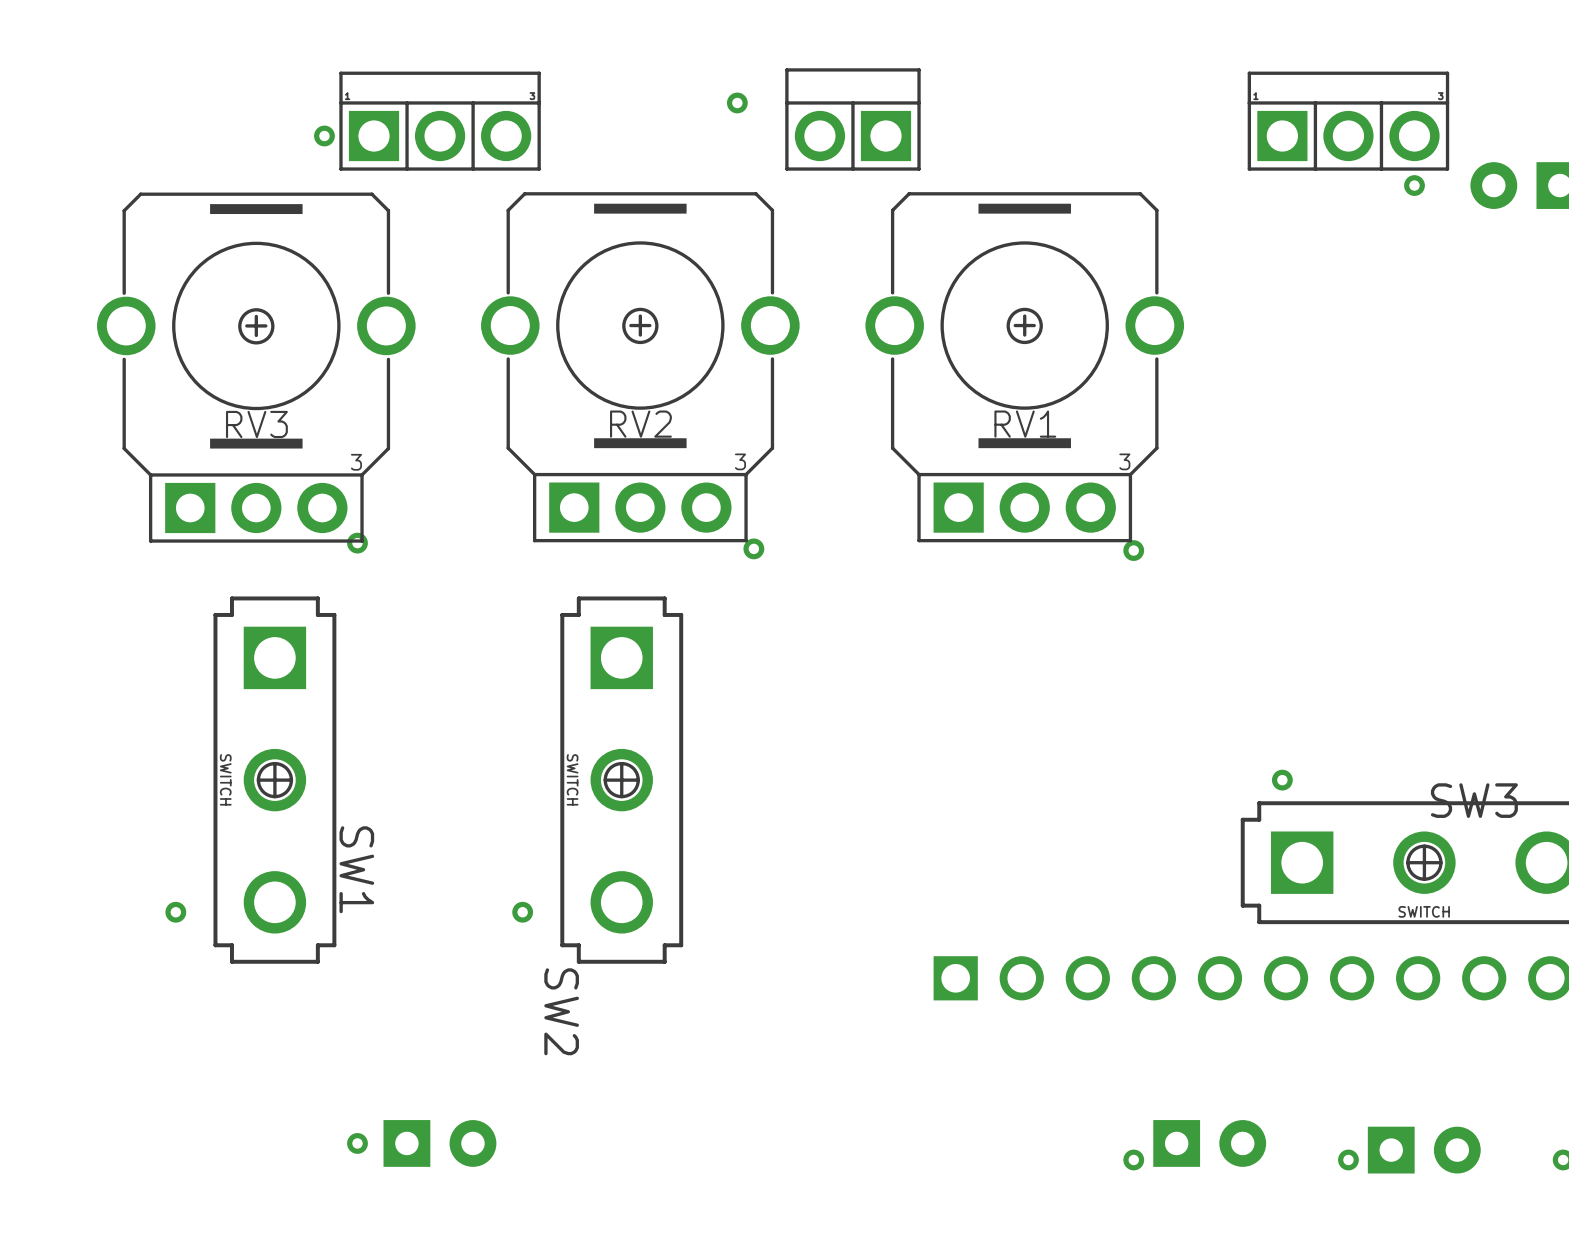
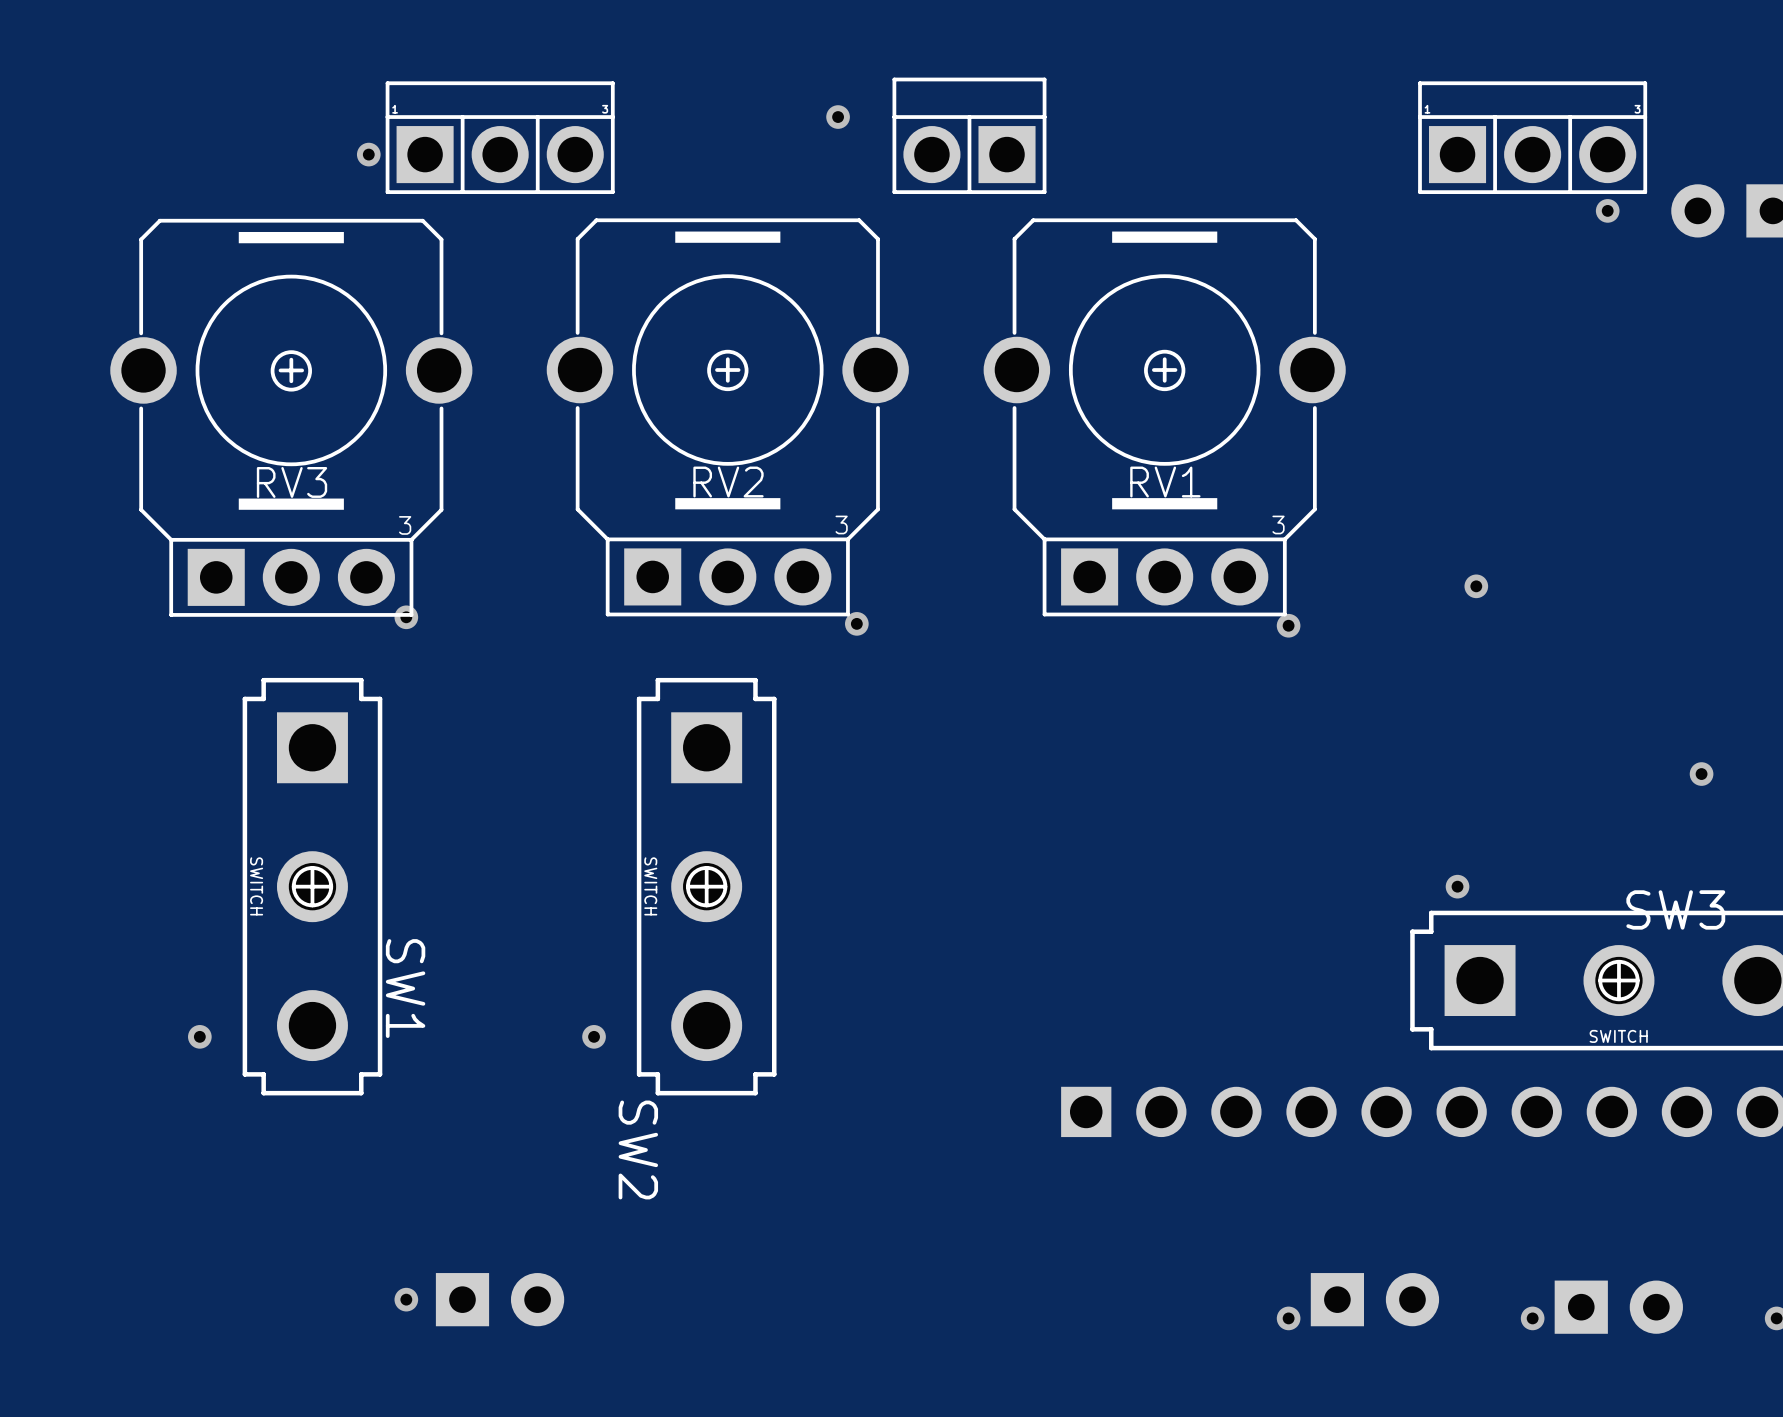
via: none -> (1476, 586)
via: none -> (1701, 774)

